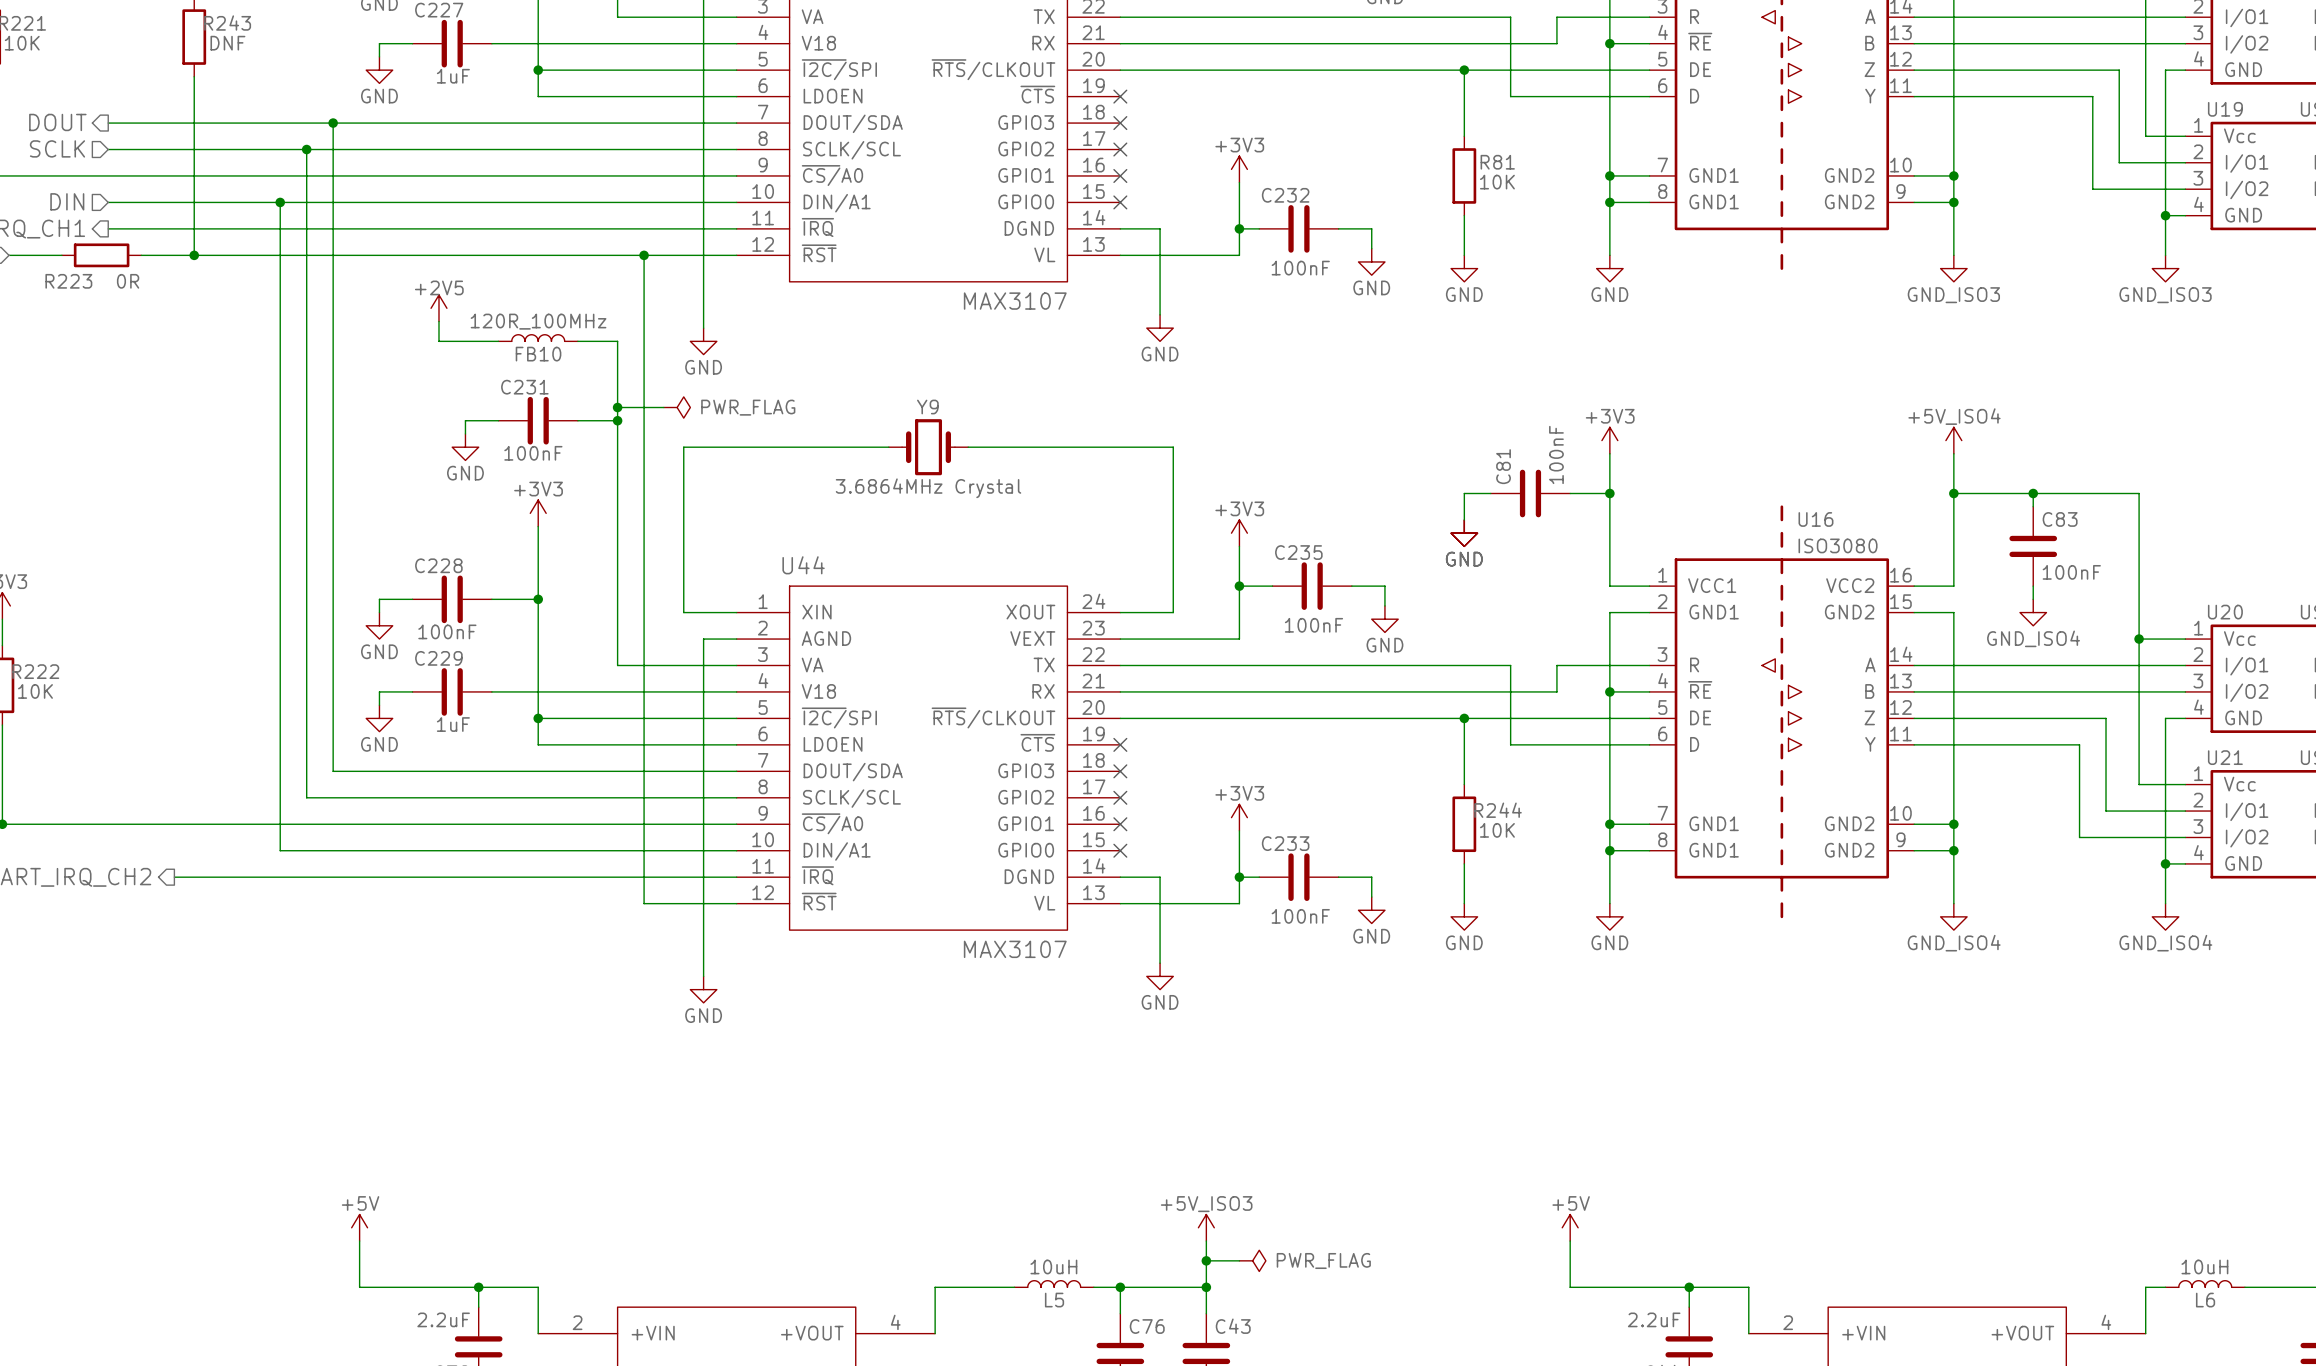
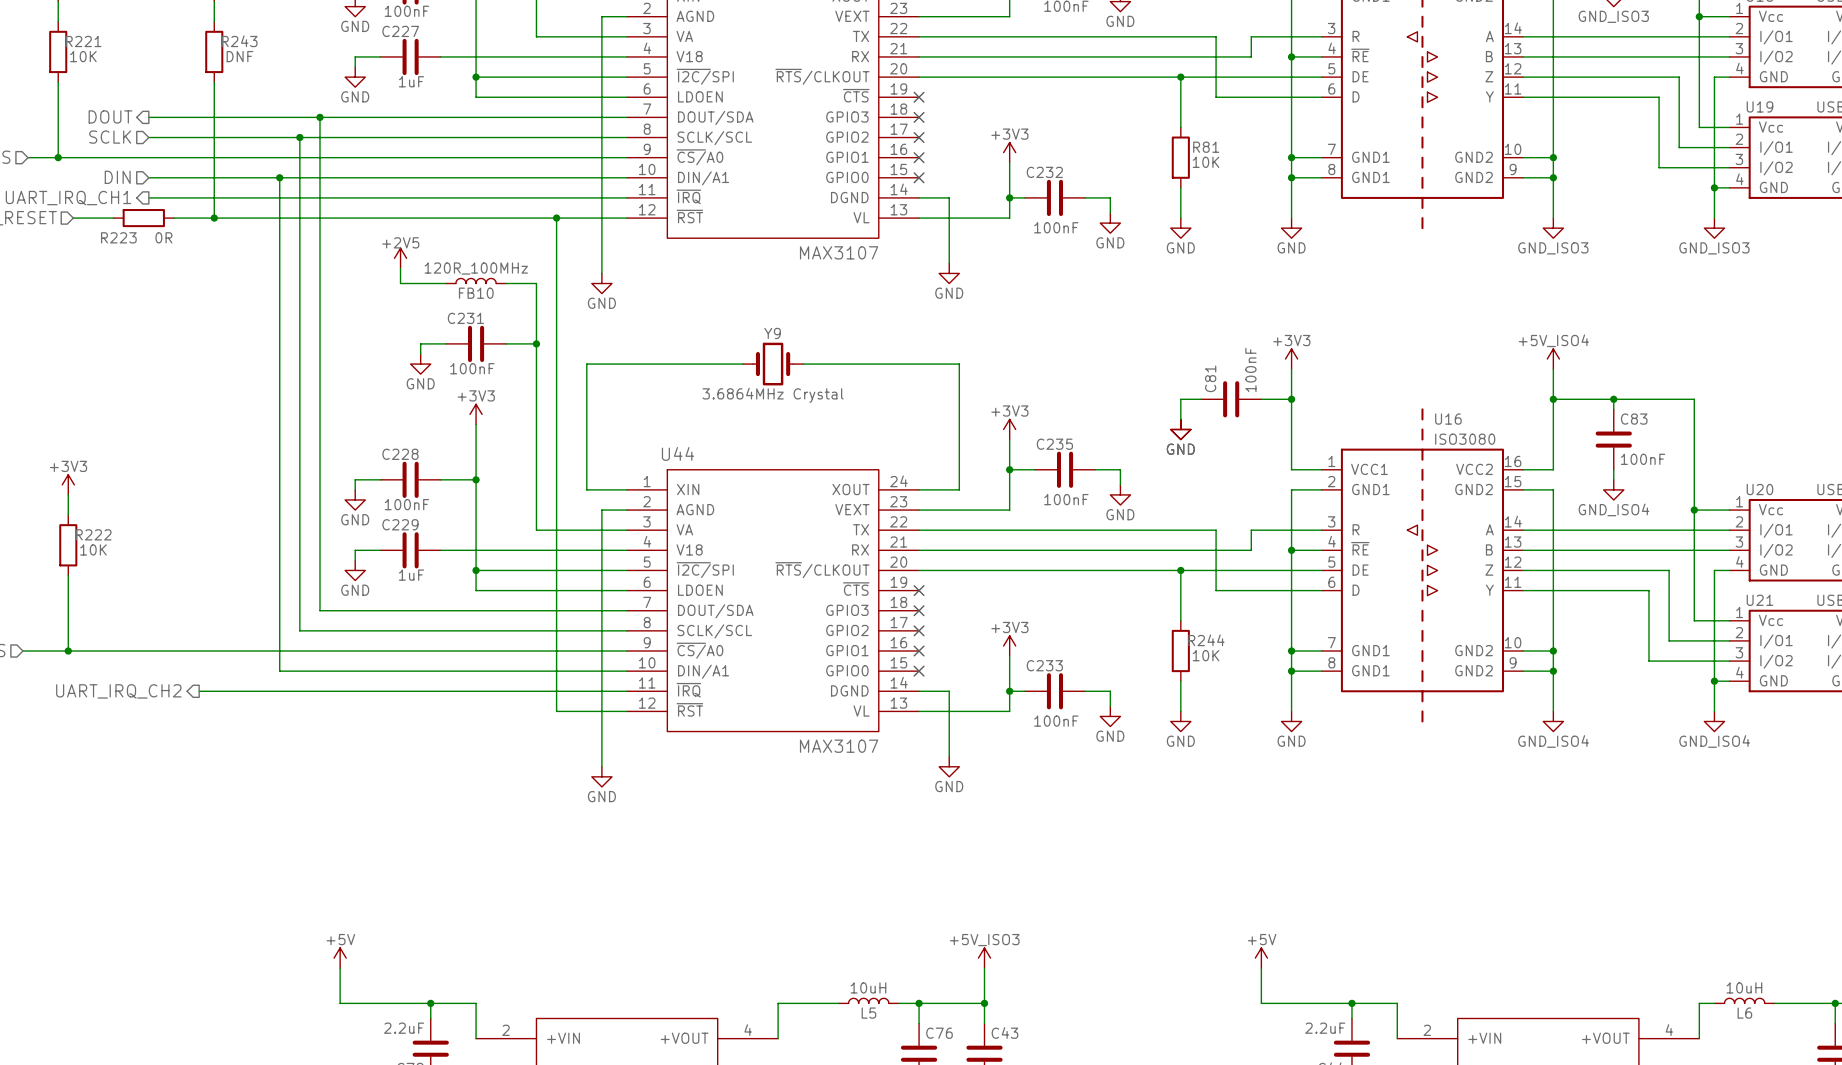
wire: (617, 407) (663, 407) -> none
junction: (617, 407) -> none
power symbol: PWR_FLAG (677, 407) -> none
wire: (1206, 1260) (1239, 1260) -> none
junction: (1206, 1260) -> none
power symbol: PWR_FLAG (1252, 1260) -> none

